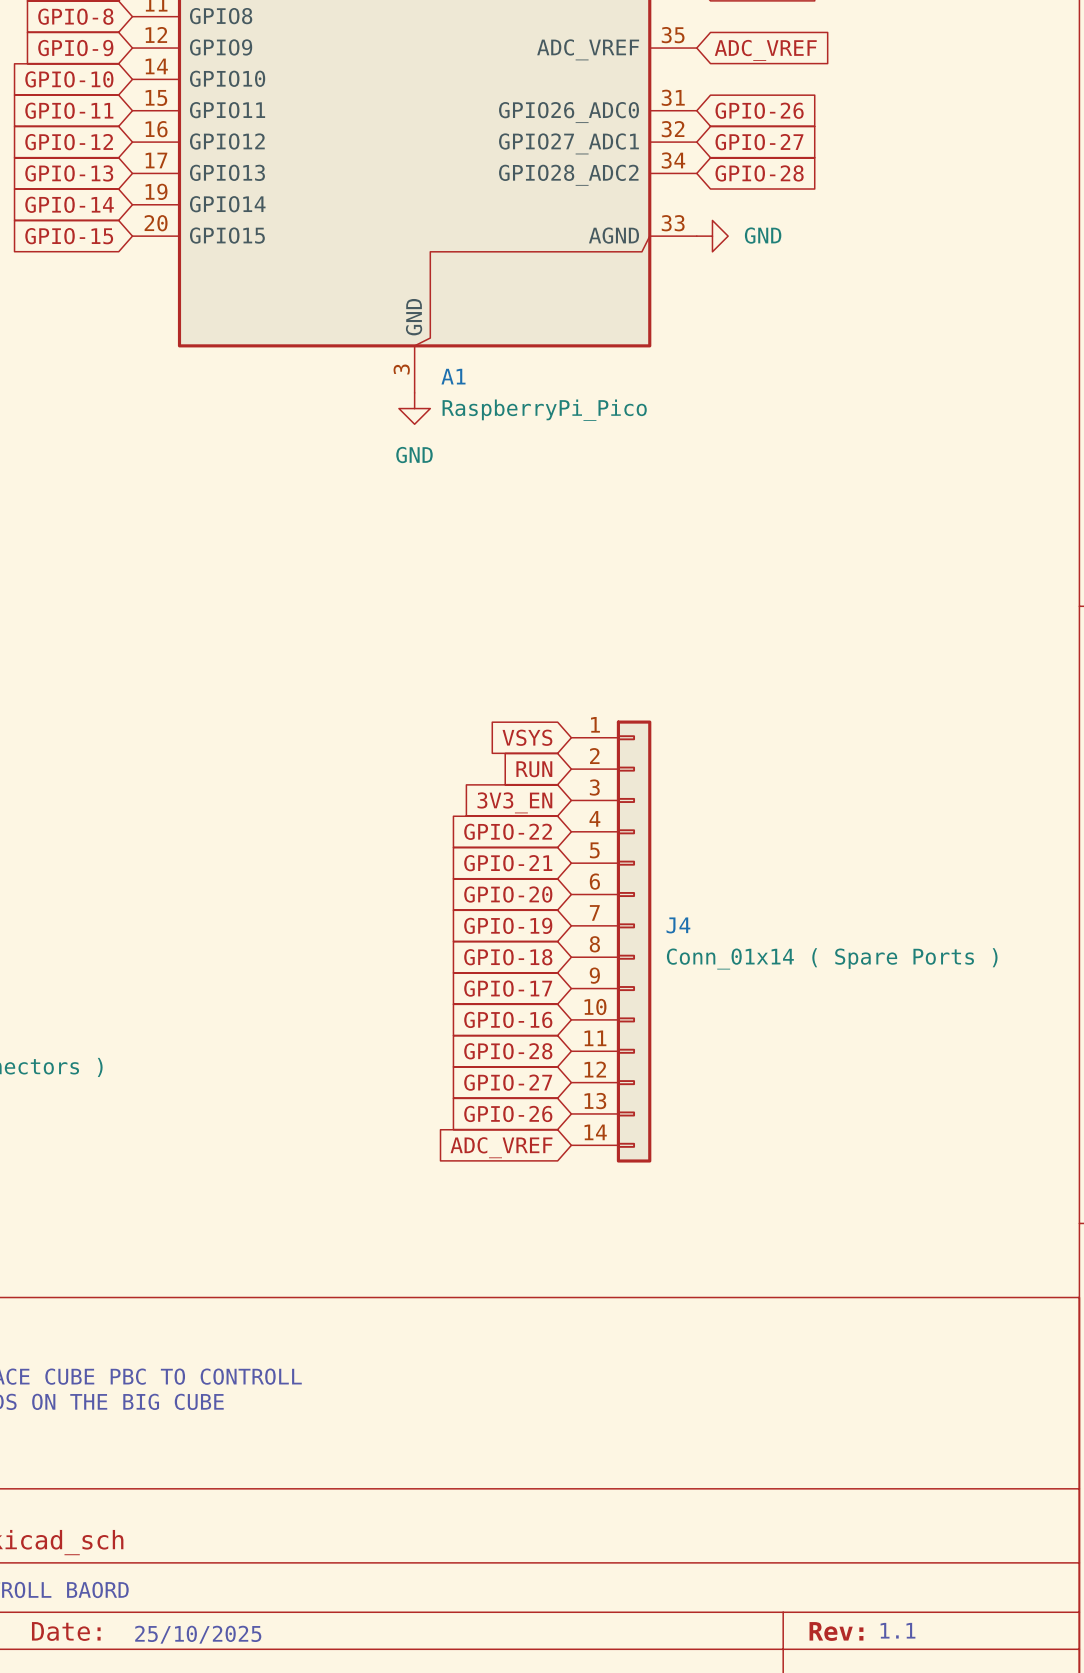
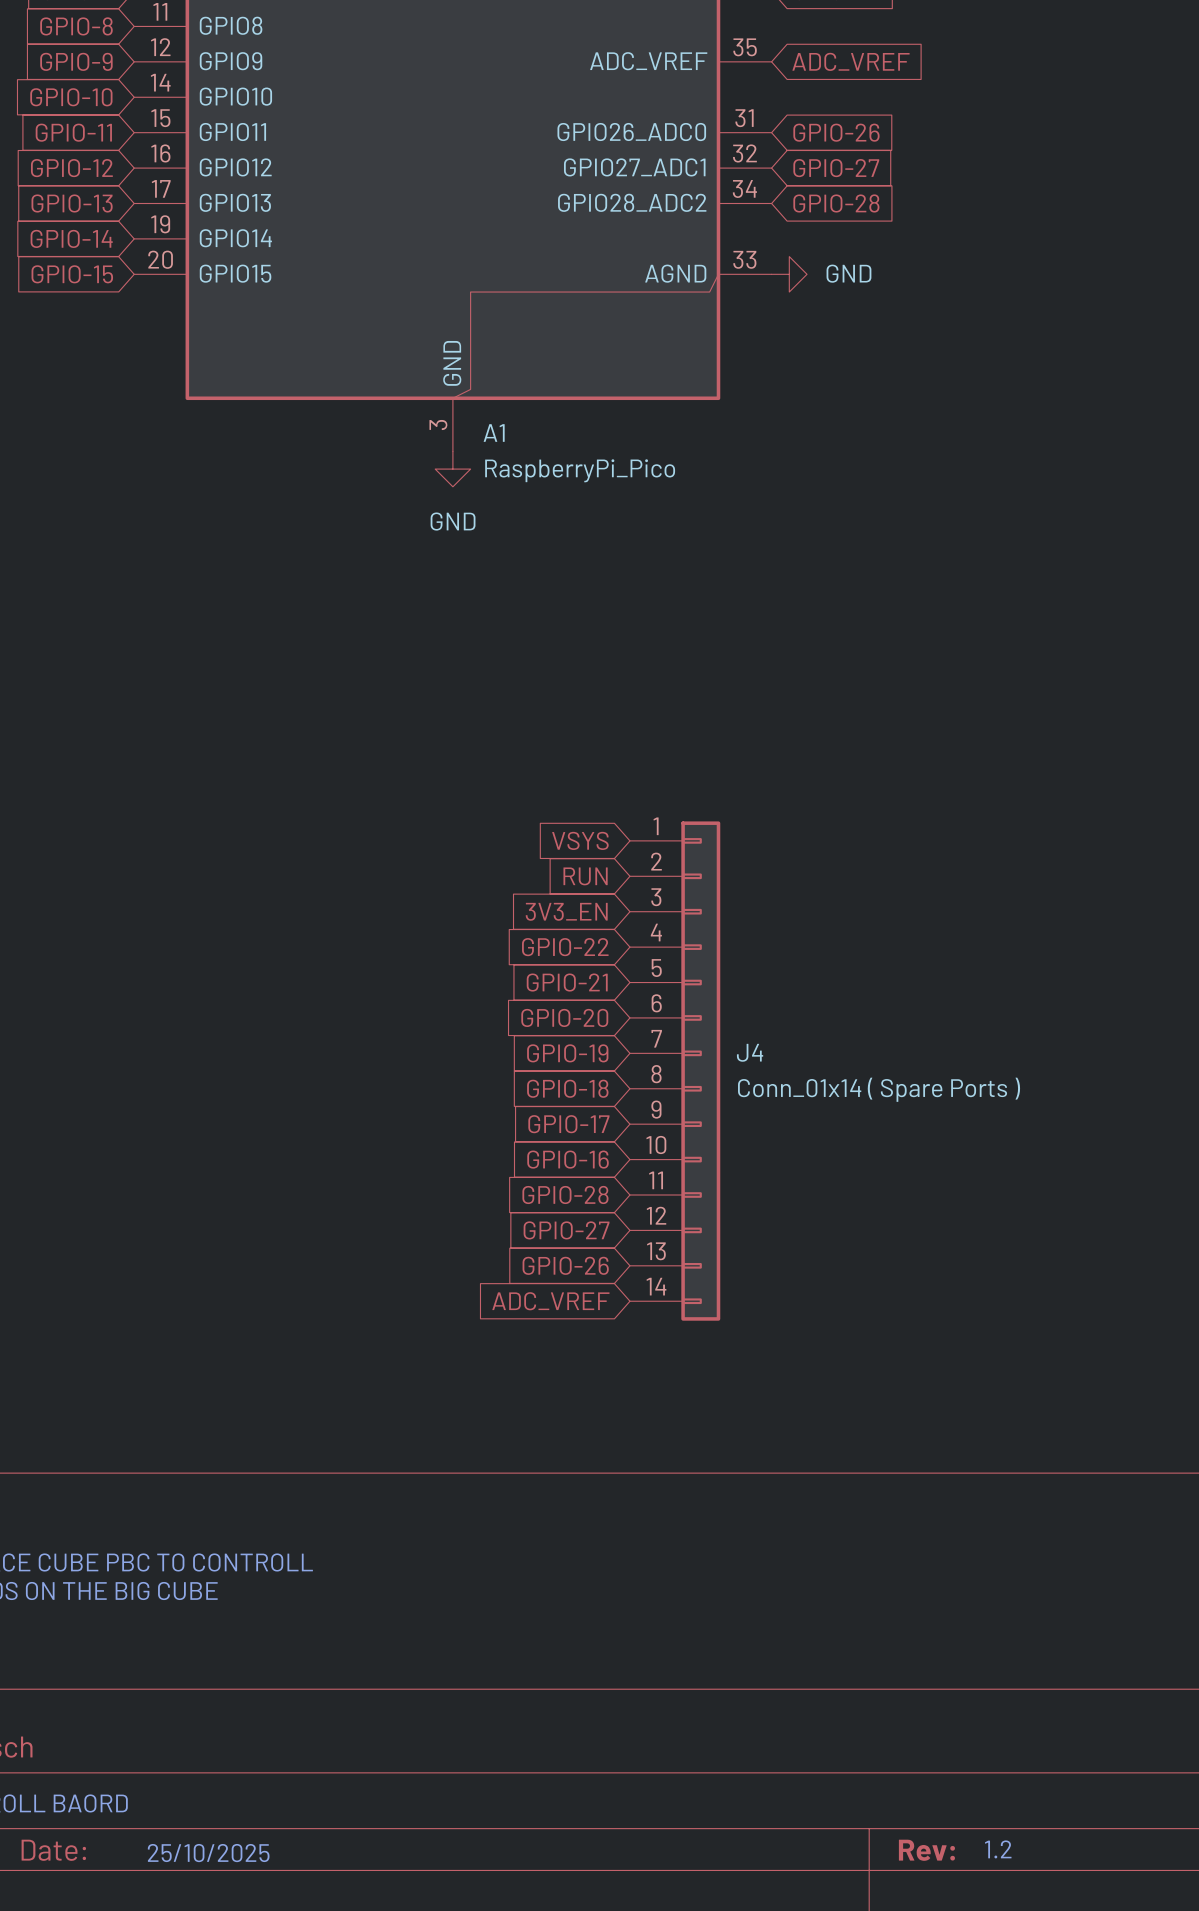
text: 1.1 (898, 1630) -> 1.2 (998, 1849)

